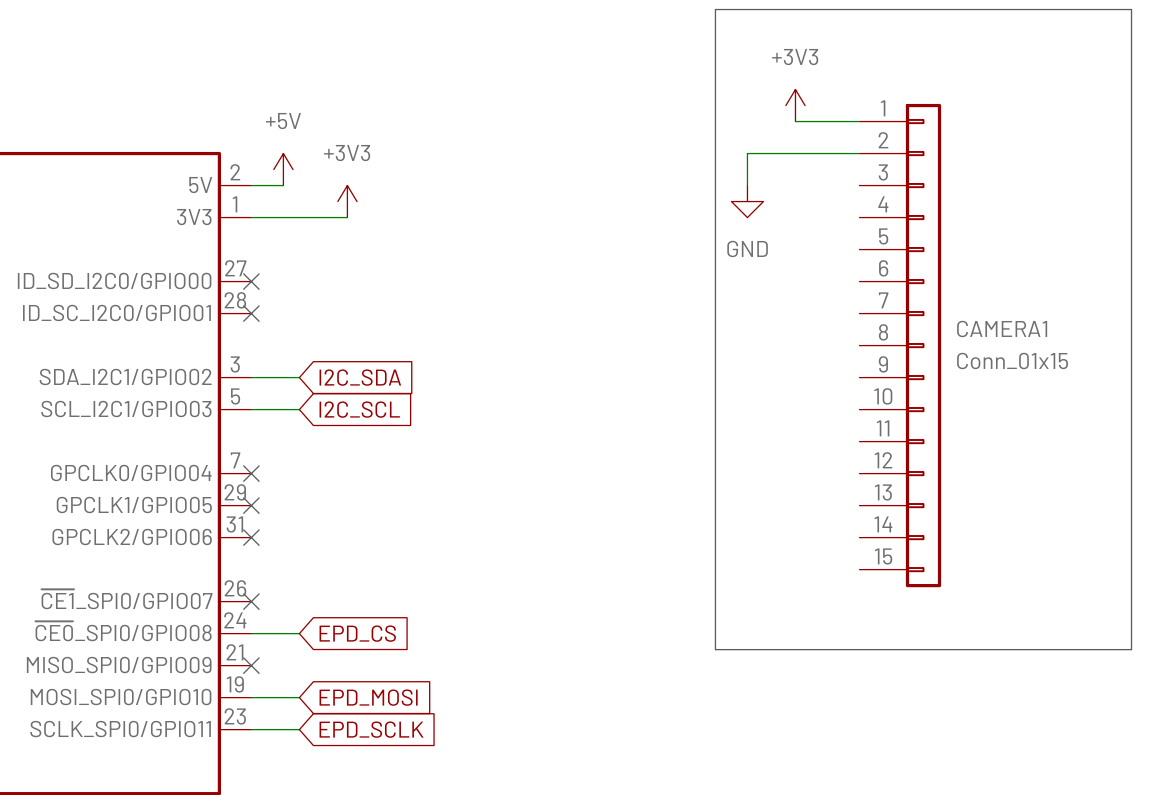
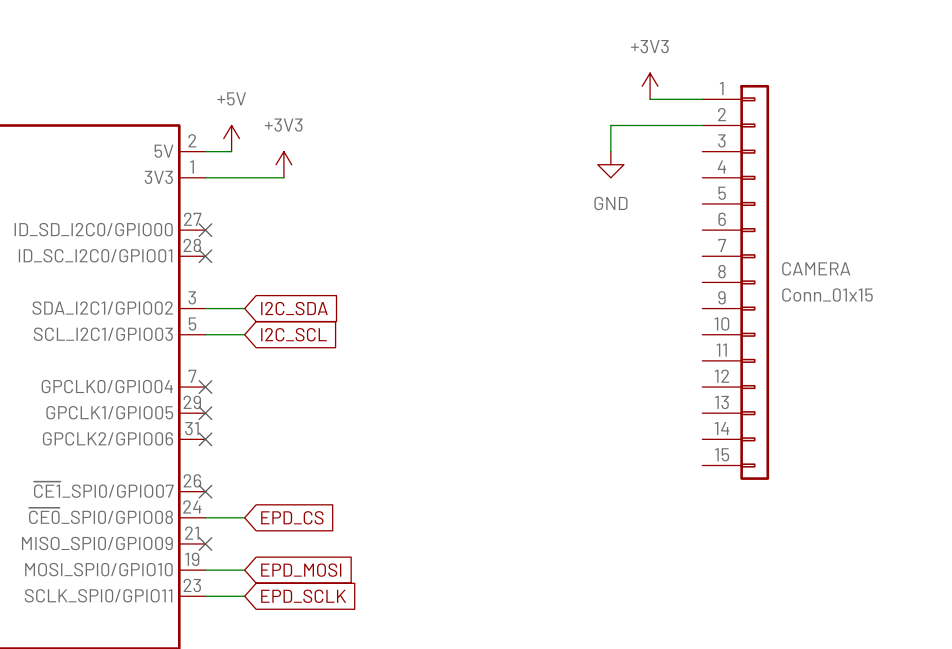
line: (715, 9) (1131, 9) (1131, 649) (715, 649) (715, 9) -> none
CAMERA1 name: CAMERA1 (1002, 328) -> CAMERA (816, 268)

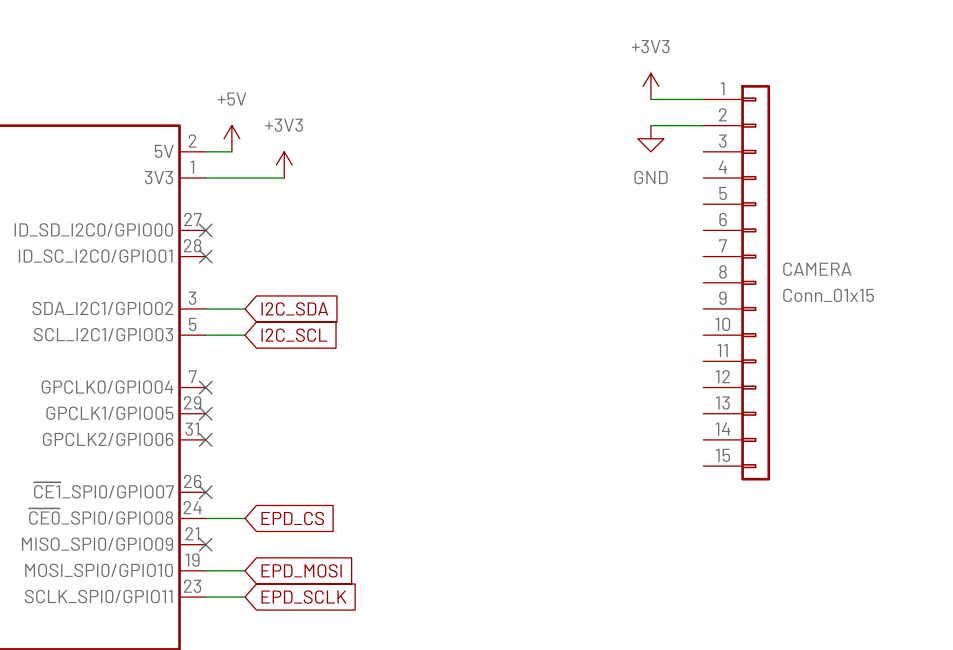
wire: (650, 125) (610, 125) (610, 151) -> none
power symbol position: GND (610, 164) -> GND (650, 138)

